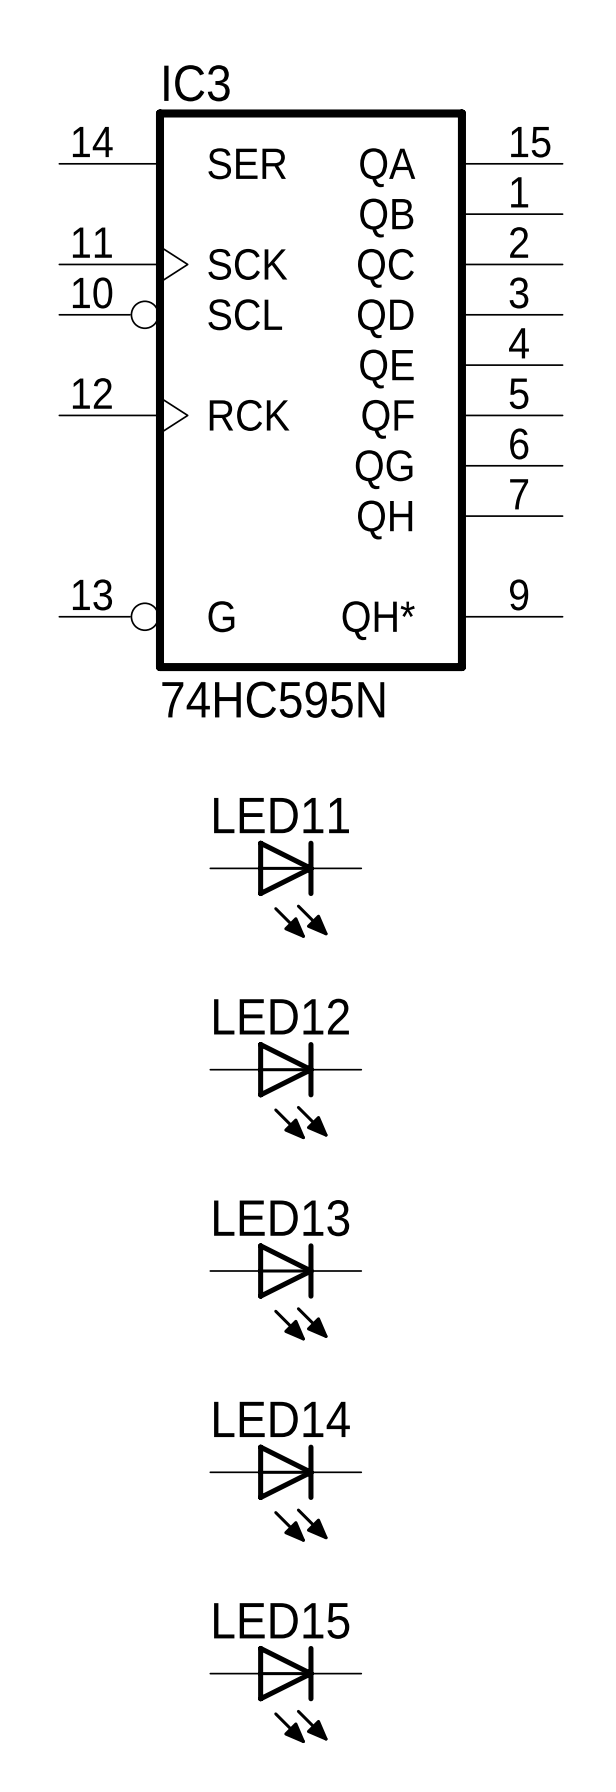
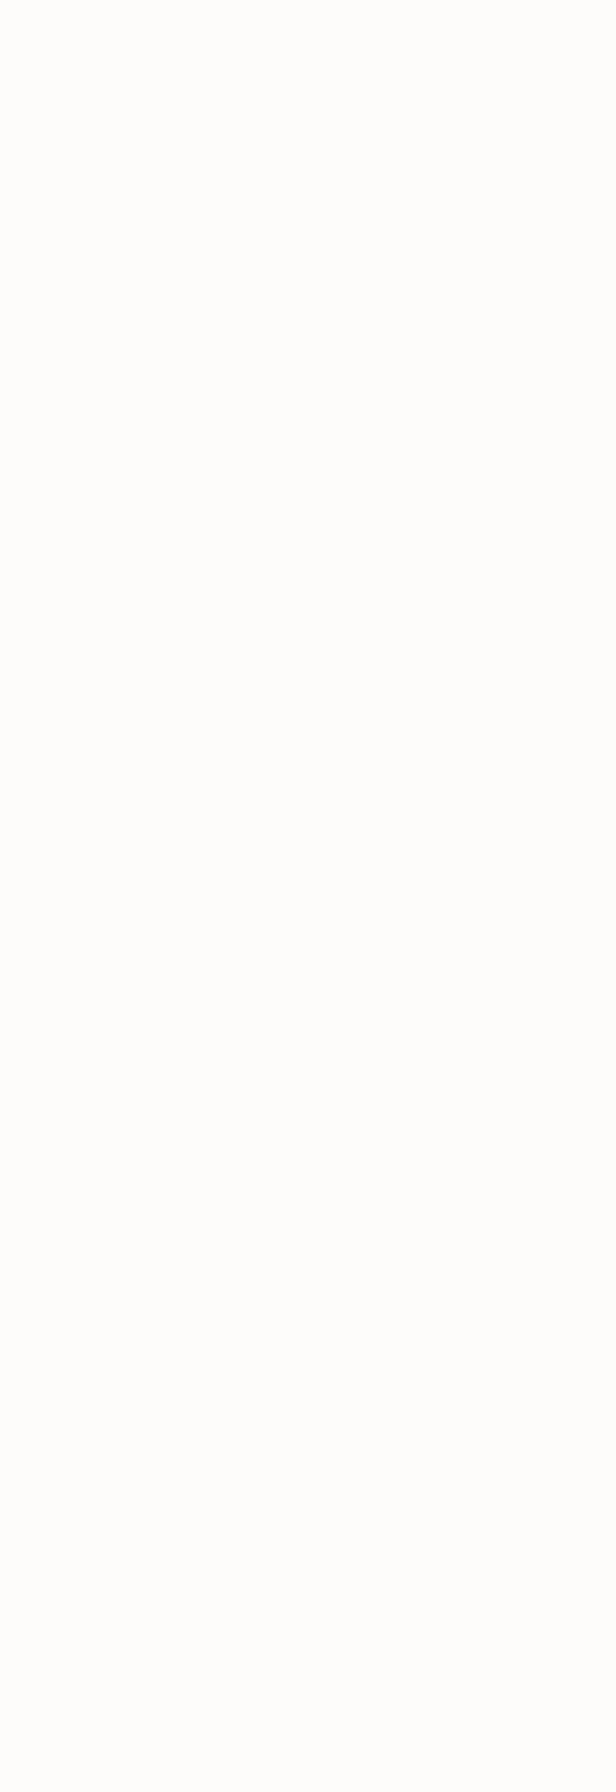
IC3: 74HC595N (310, 390) -> none
LED11: (285, 889) -> none
LED12: (285, 1090) -> none
LED13: (285, 1291) -> none
LED14: (285, 1493) -> none
LED15: (285, 1694) -> none

